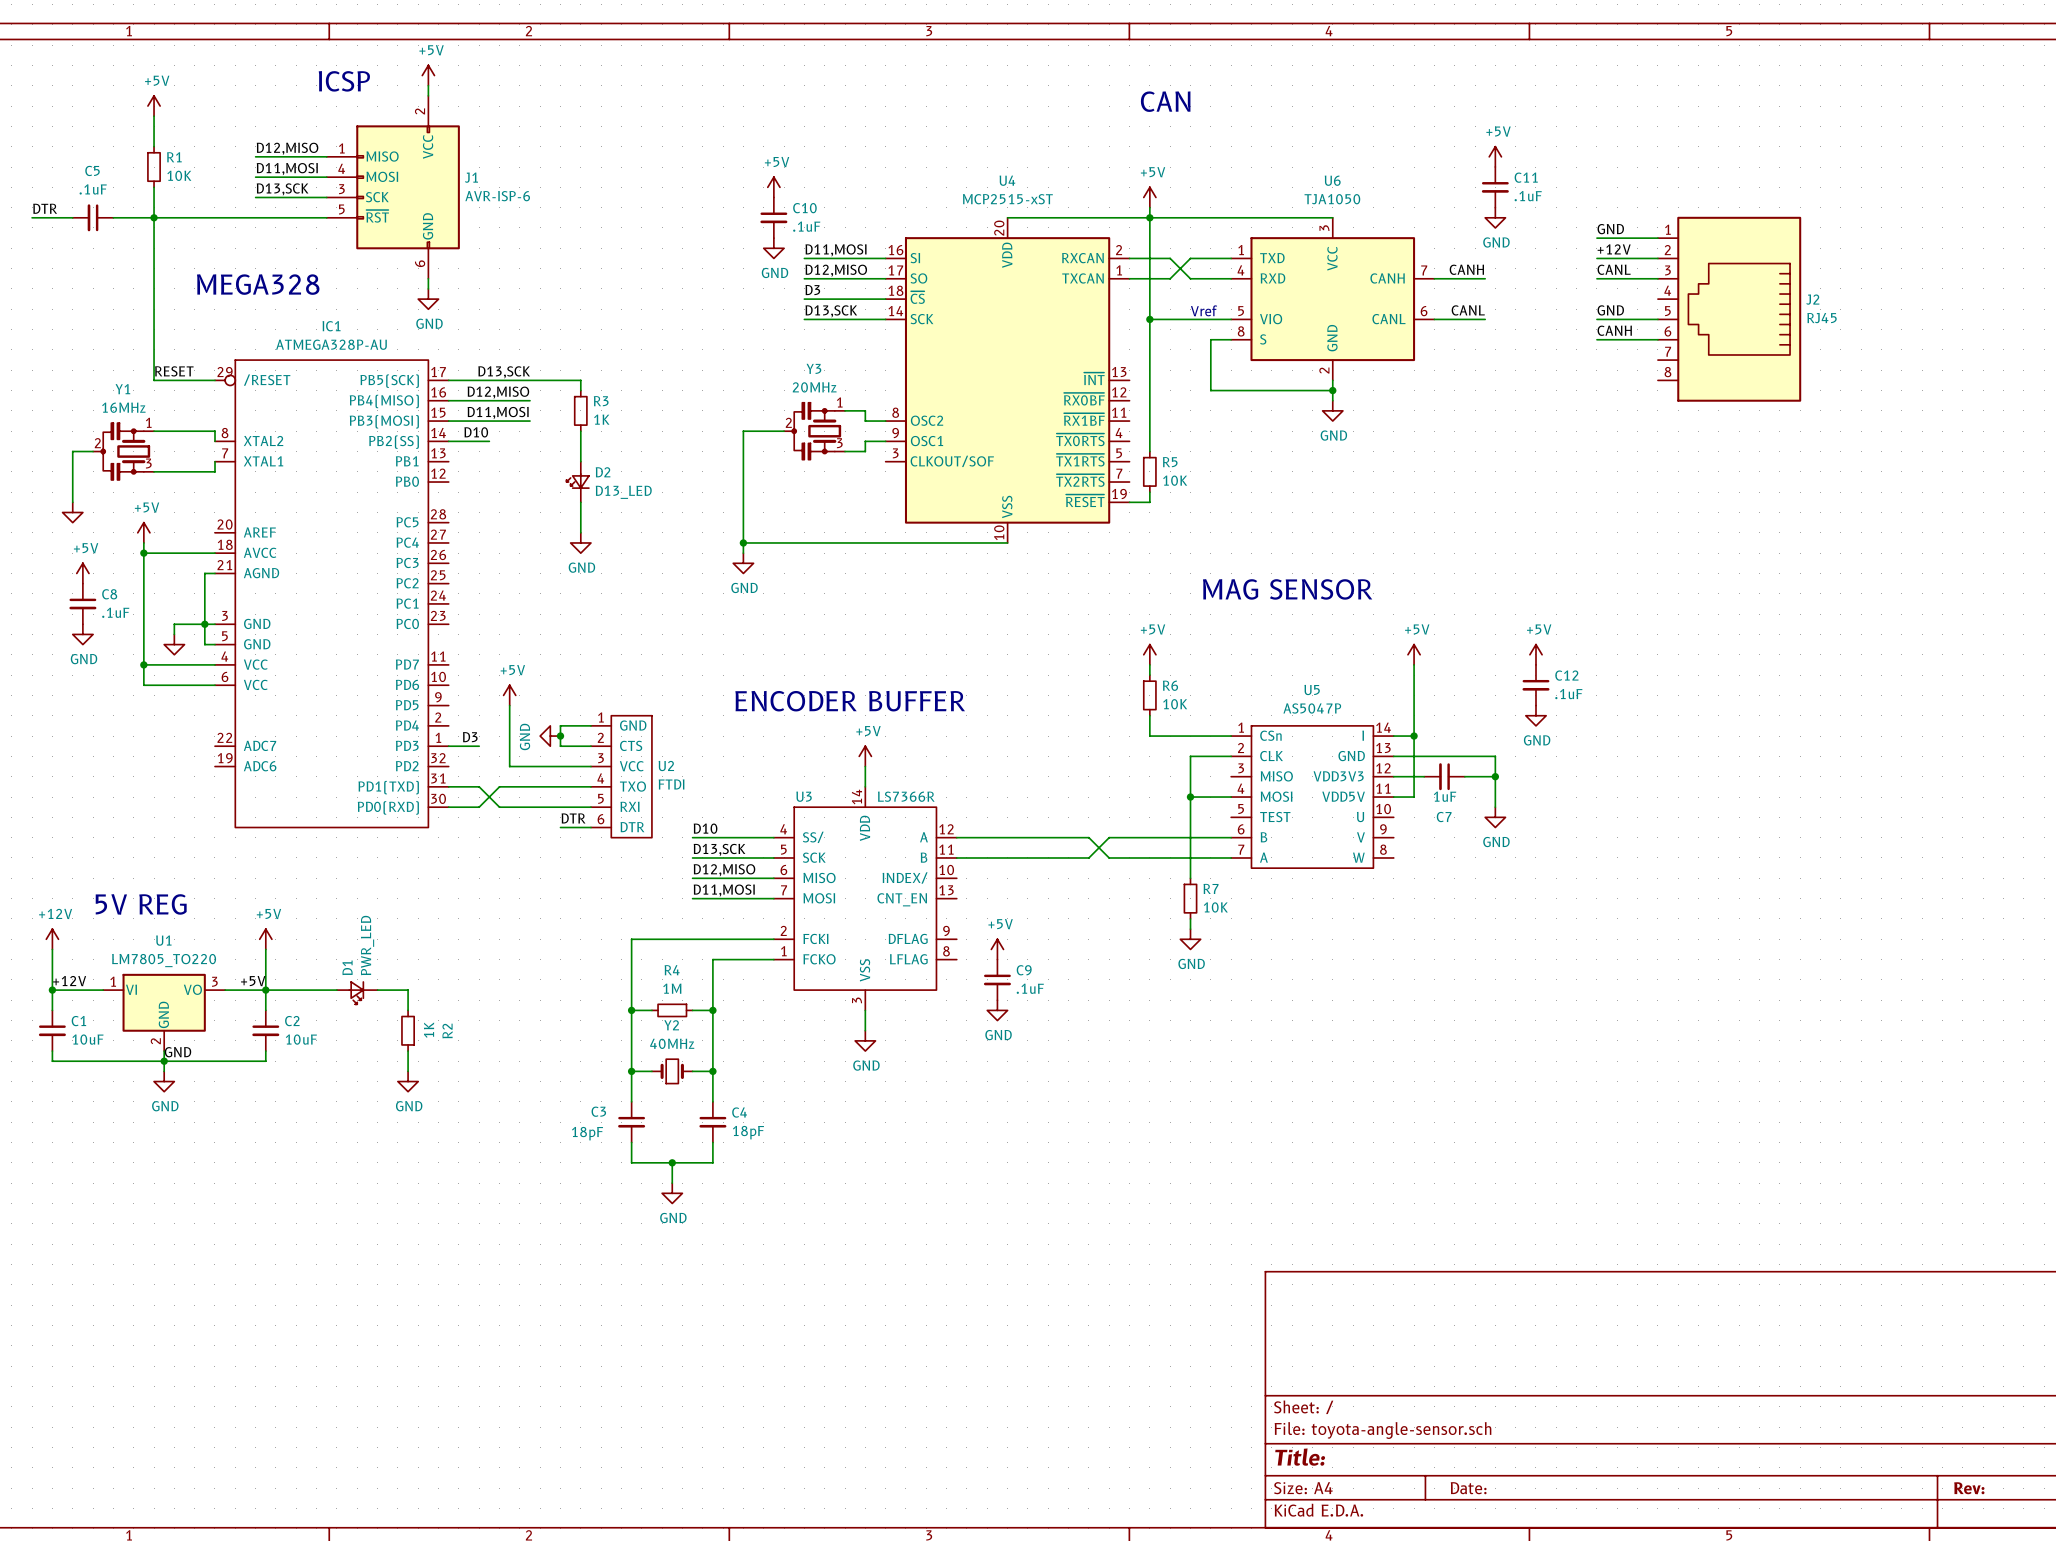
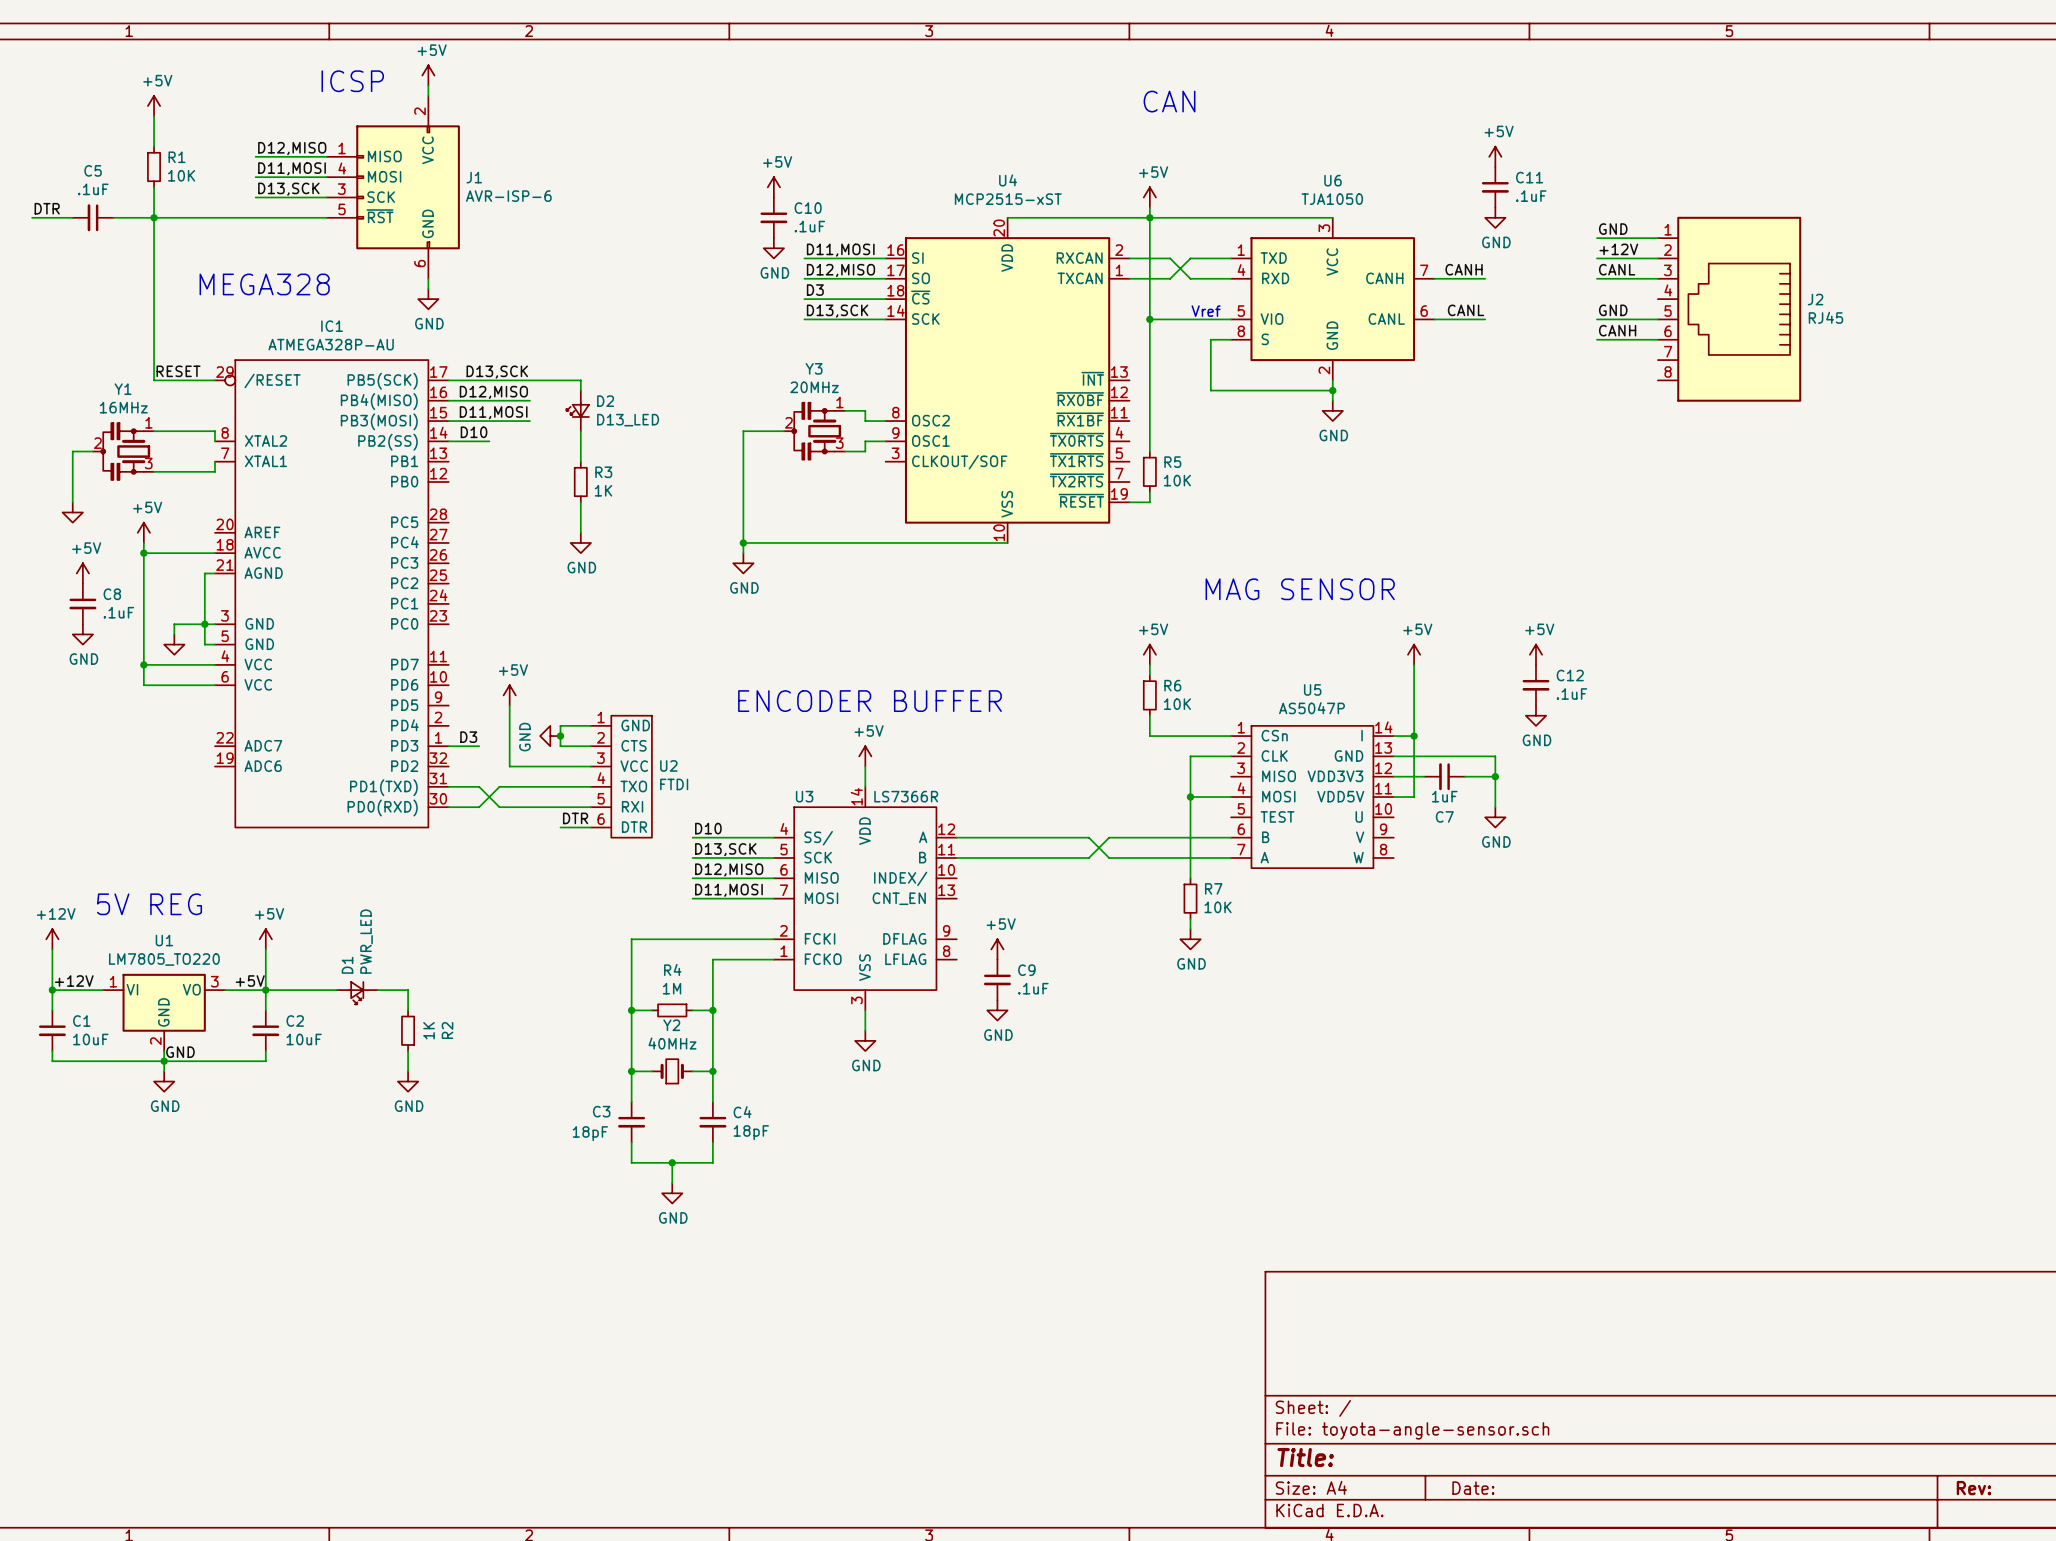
R3 position: (580, 410) -> (580, 482)
D2 position: (577, 482) -> (577, 410)

